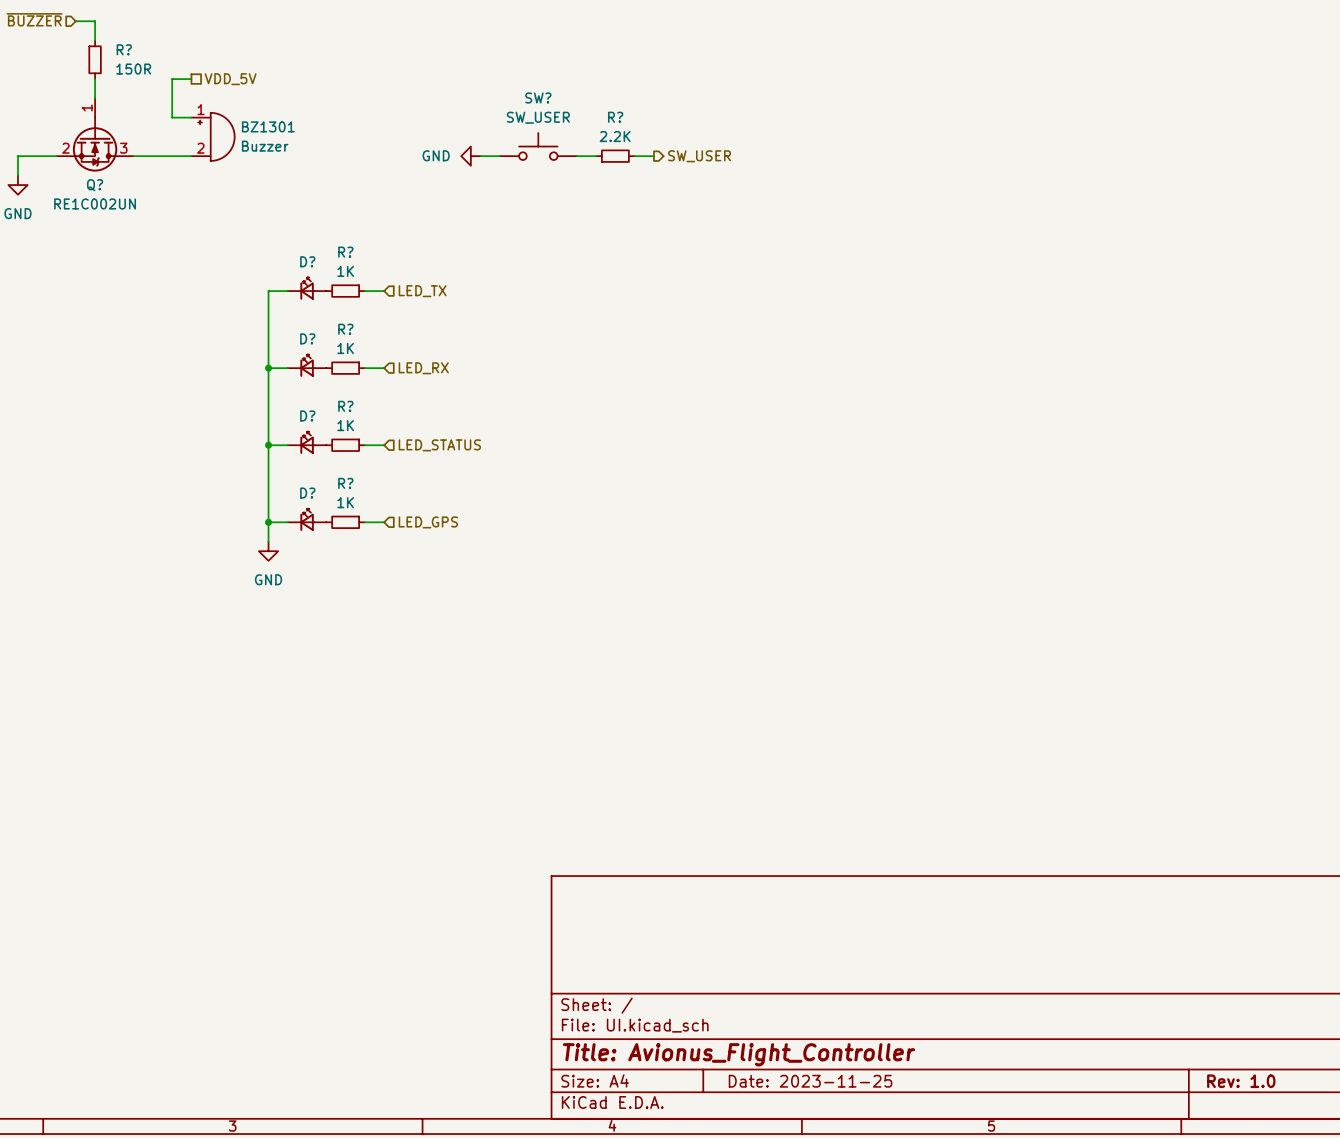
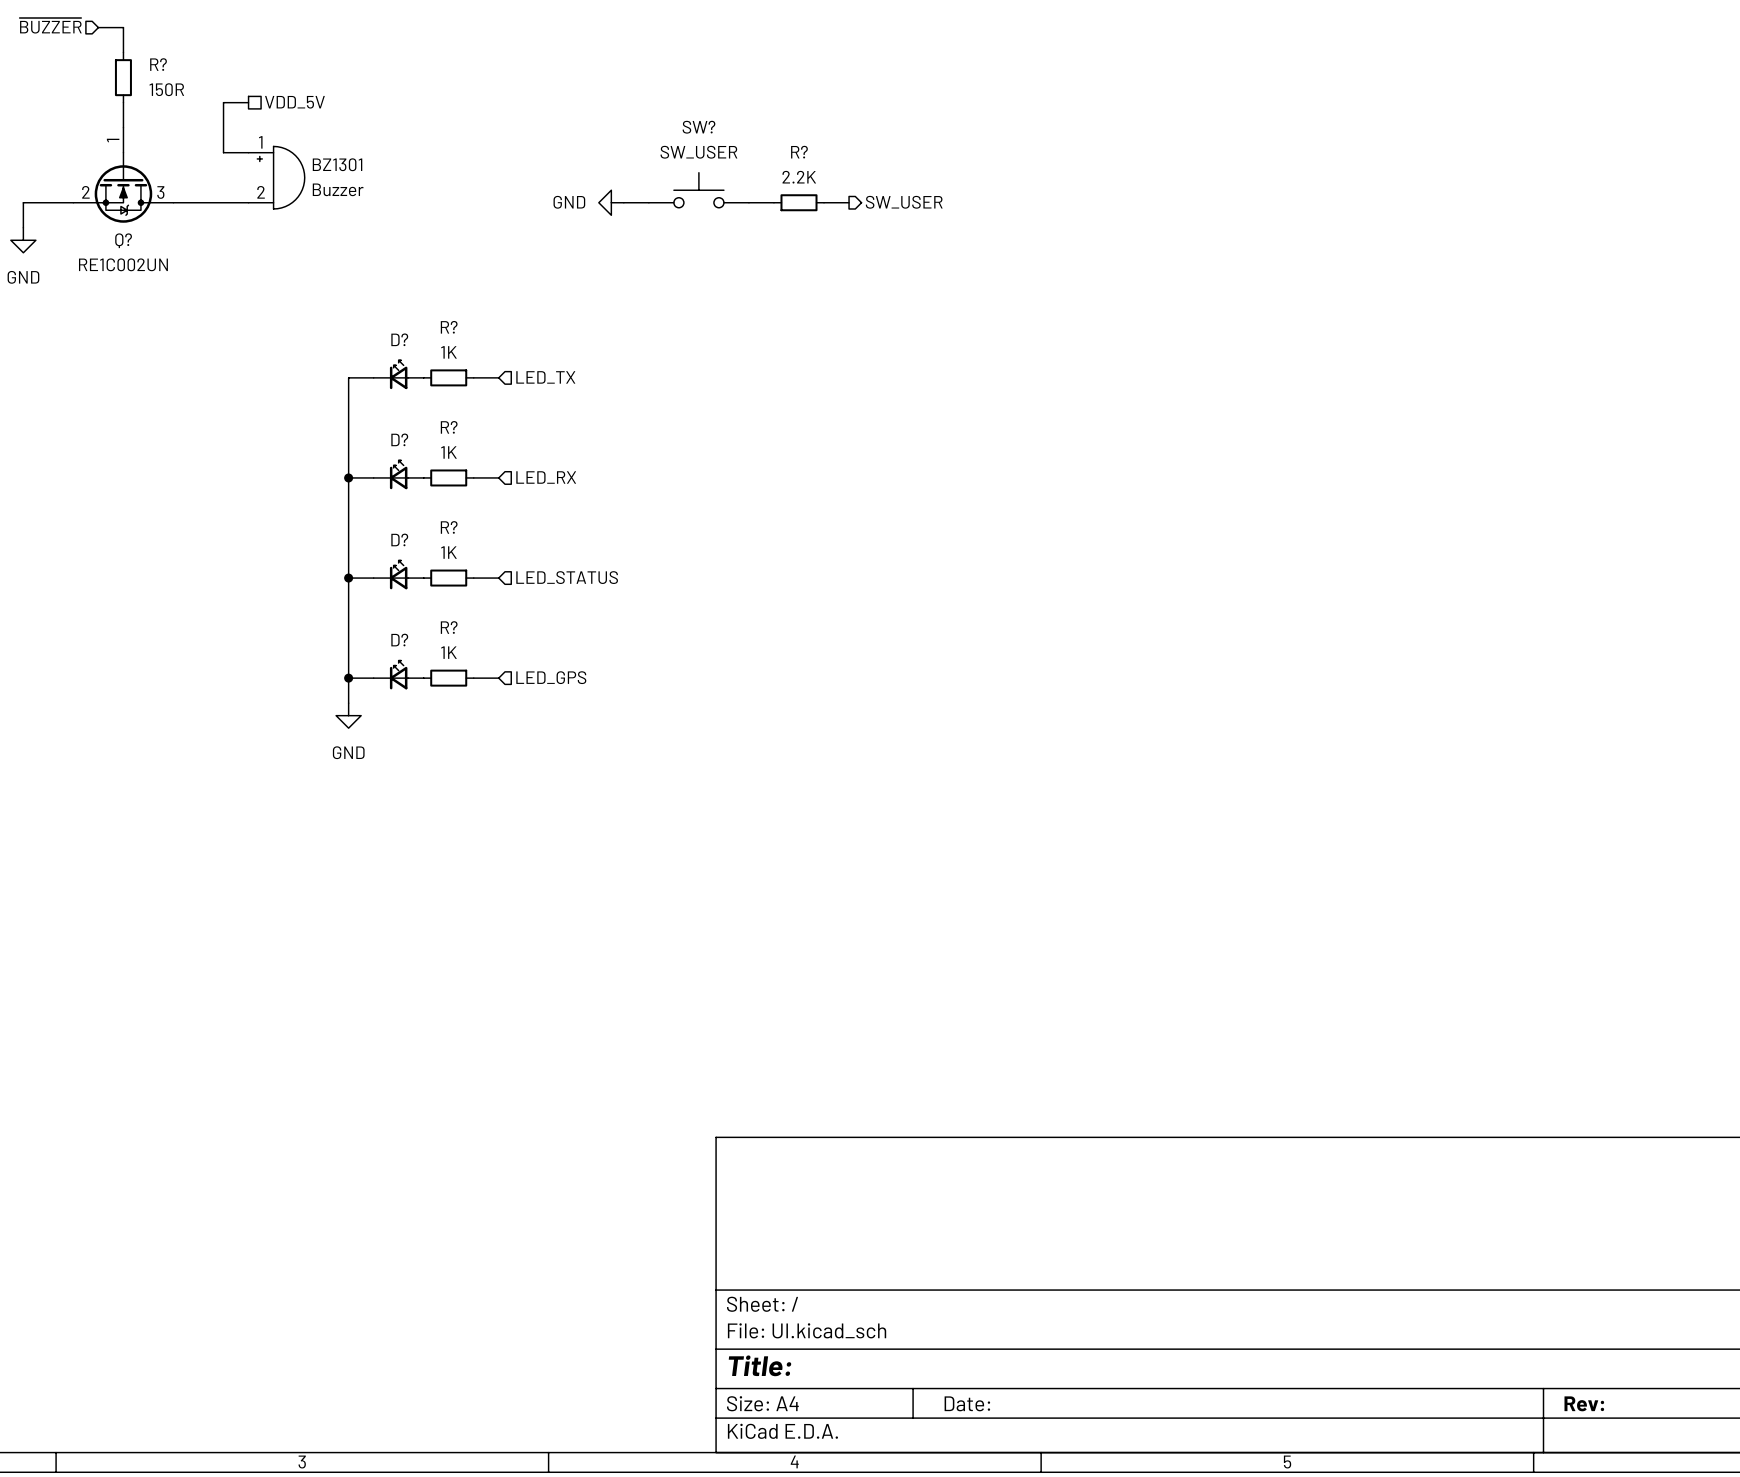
title block: Title: Avionus_Flight_Controller (739, 1054) -> Title: (760, 1365)
title block: Date: 2023-11-25 (810, 1081) -> Date: (967, 1403)
title block: Rev: 1.0 (1241, 1081) -> Rev: (1584, 1403)

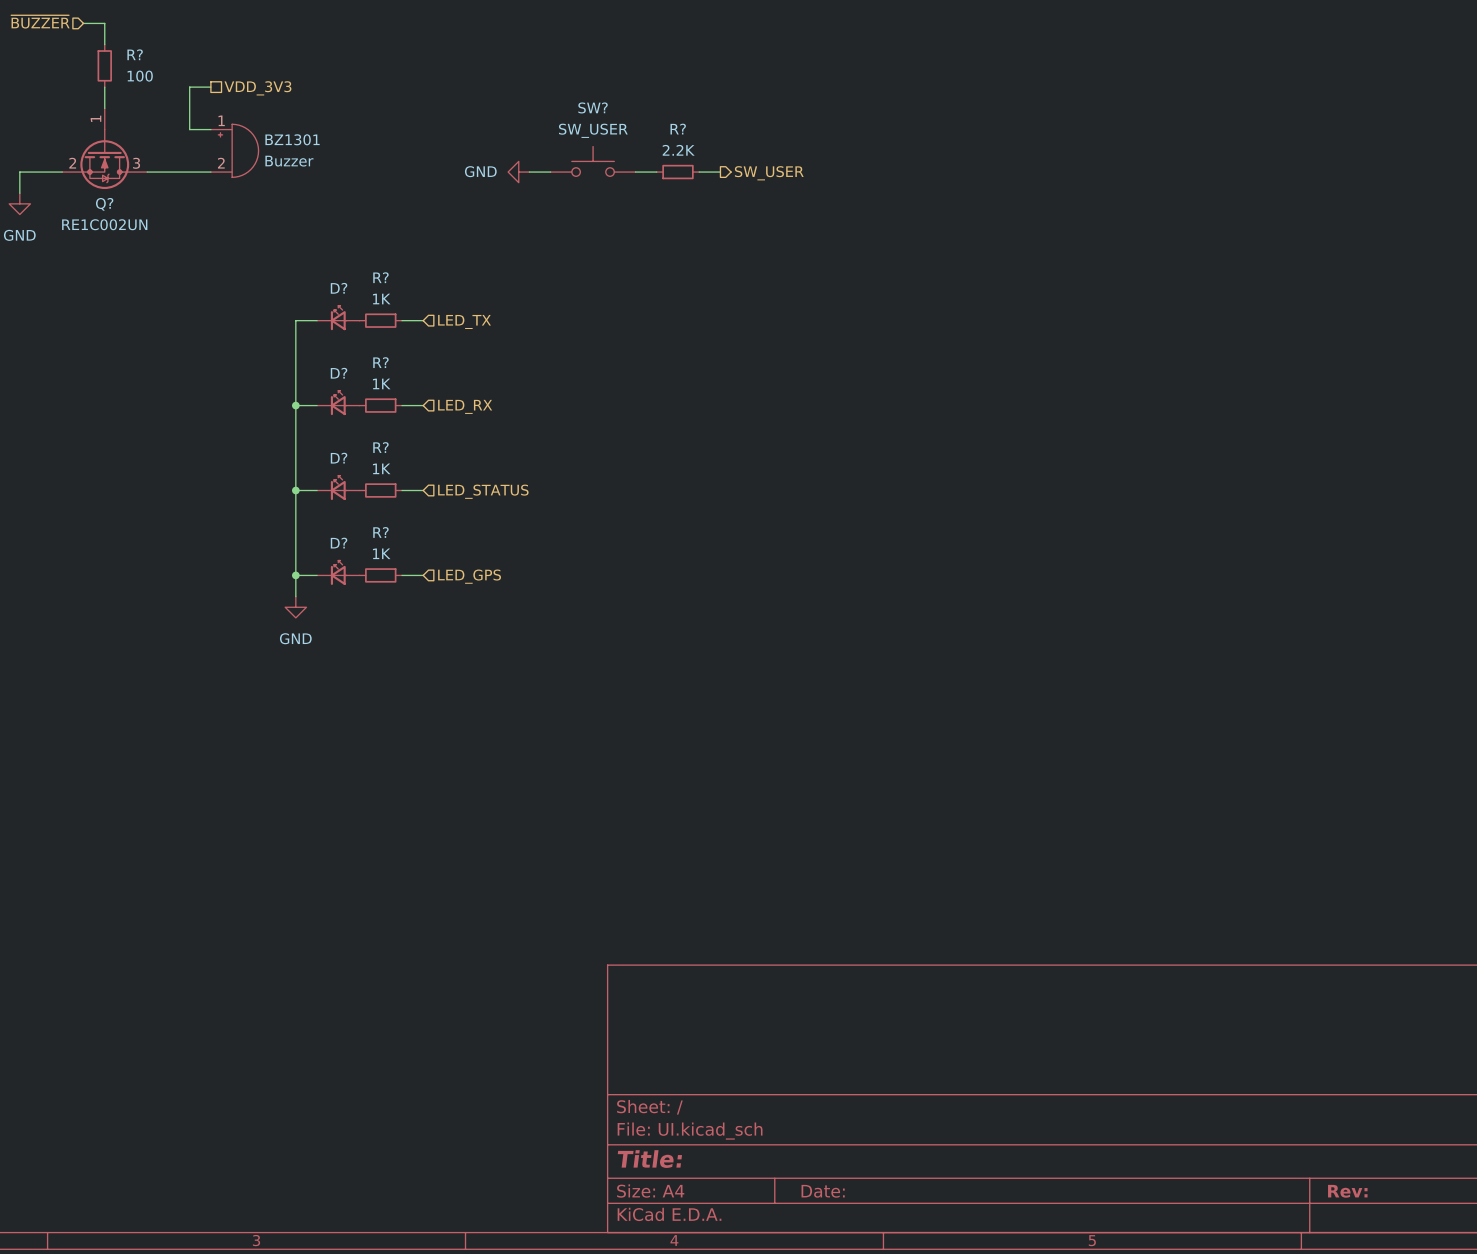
R? value: 150R (166, 89) -> 100 (140, 76)
hierarchical label: VDD_5V (294, 102) -> VDD_3V3 (257, 88)

